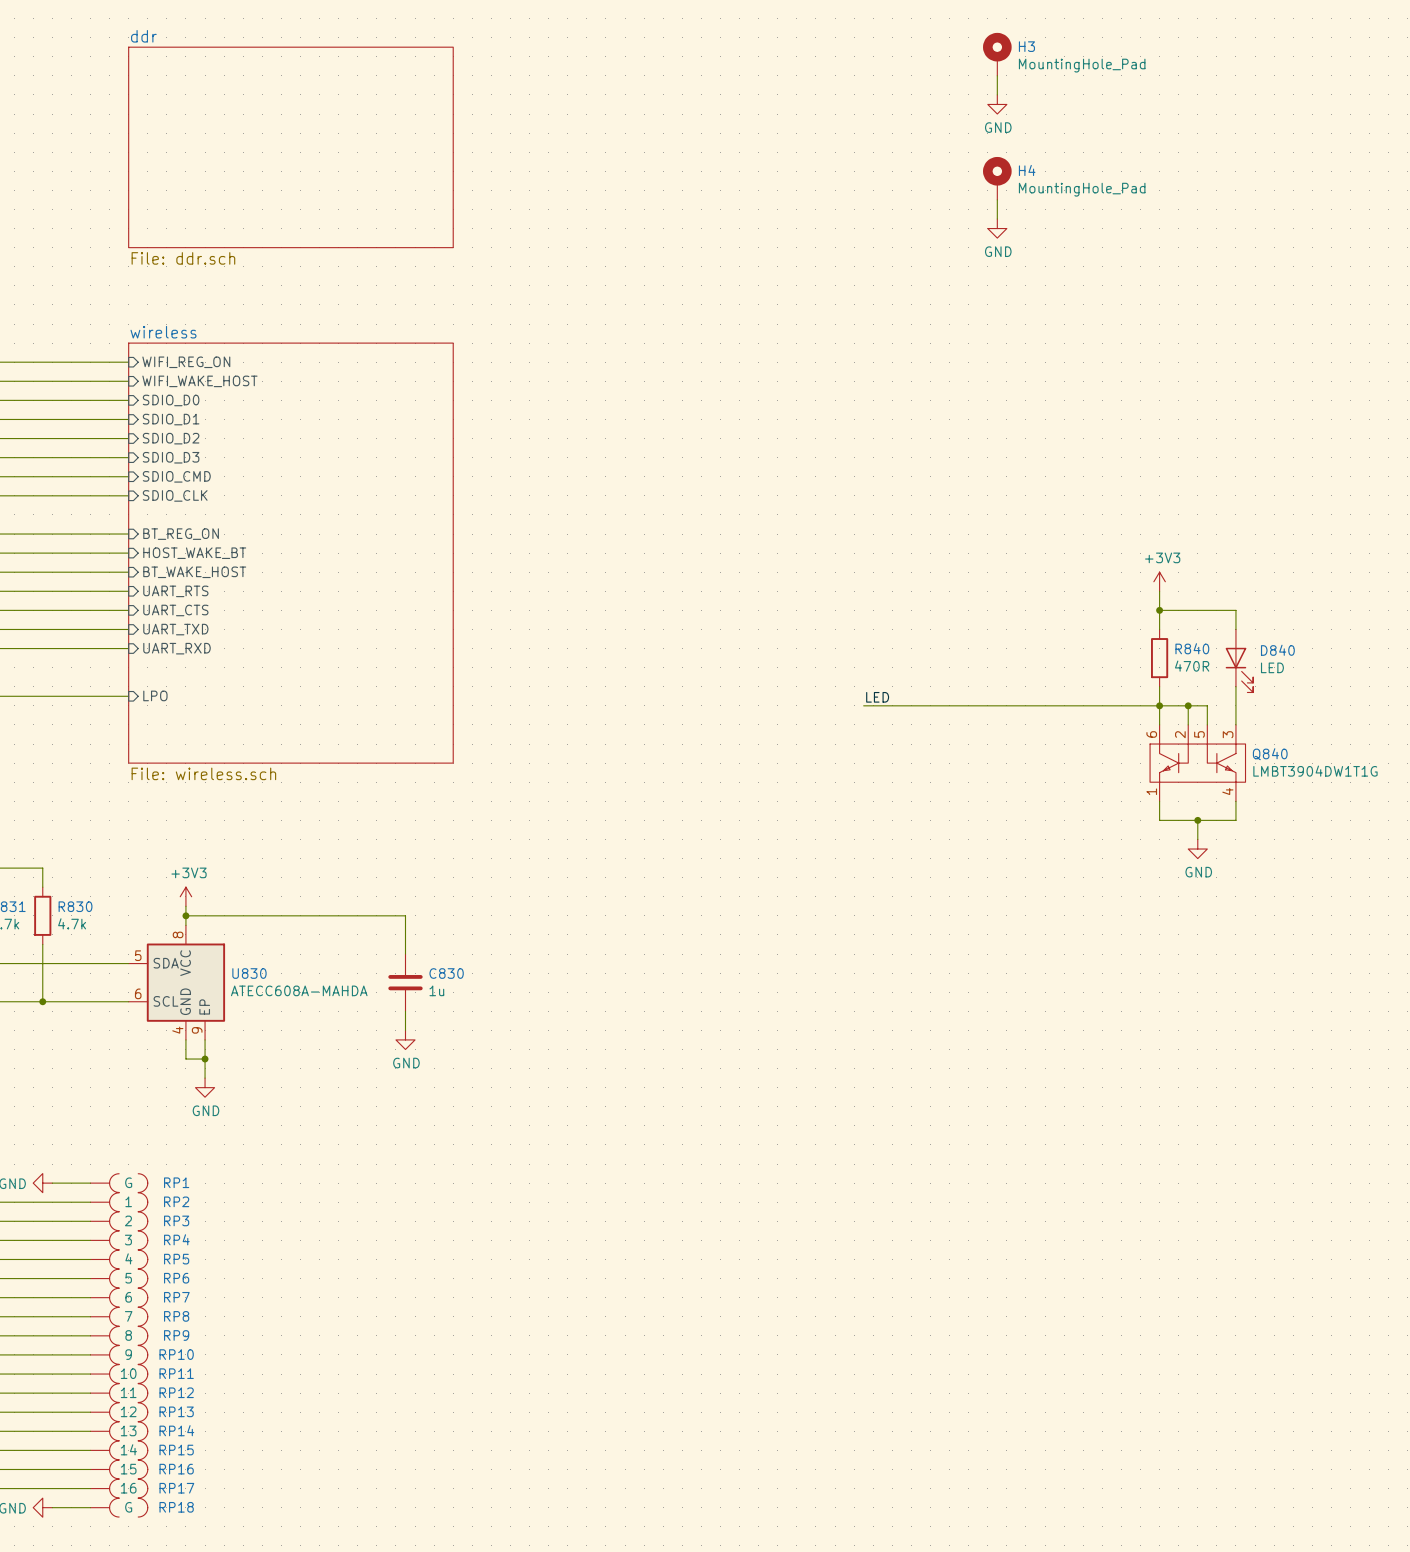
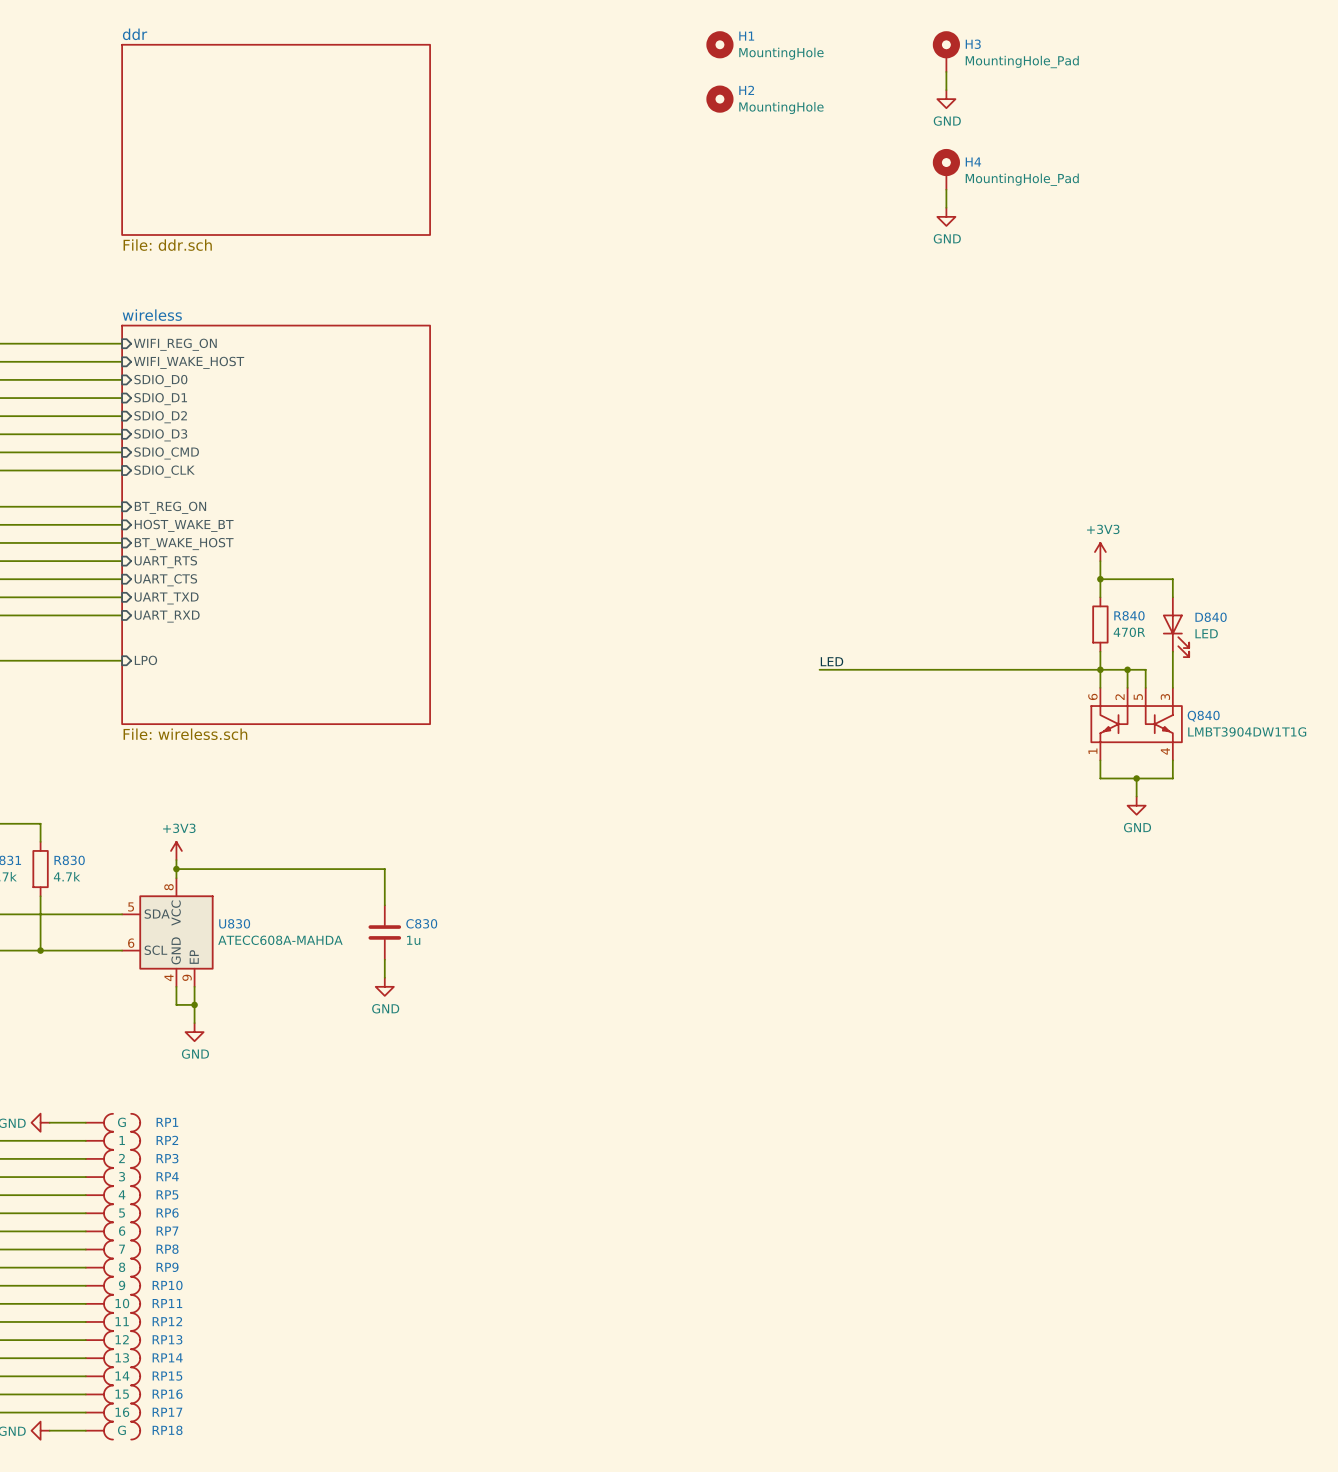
H1: none -> MountingHole (719, 44)
H2: none -> MountingHole (719, 99)

